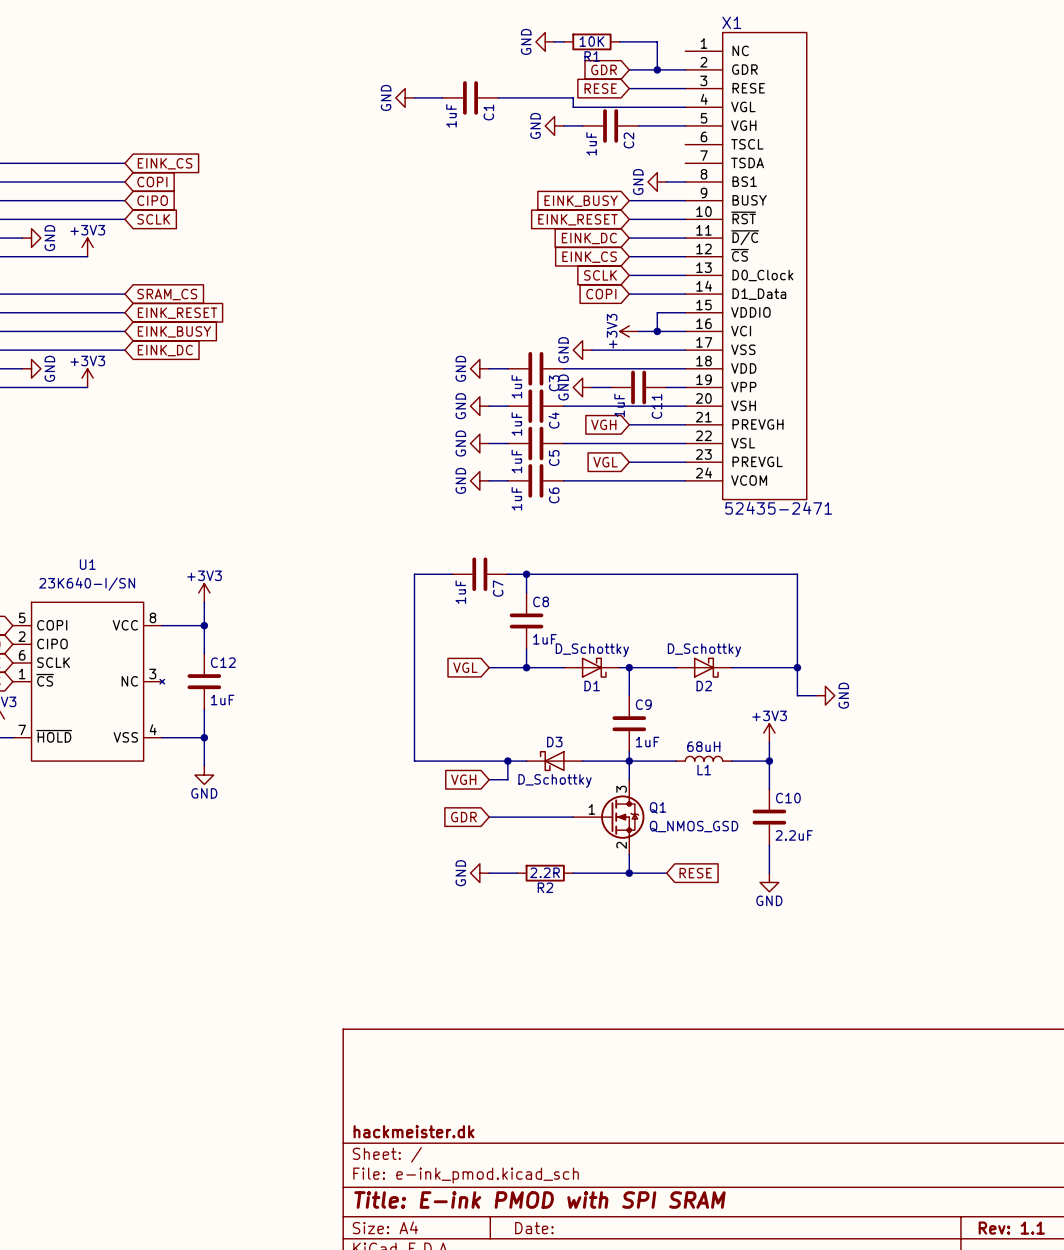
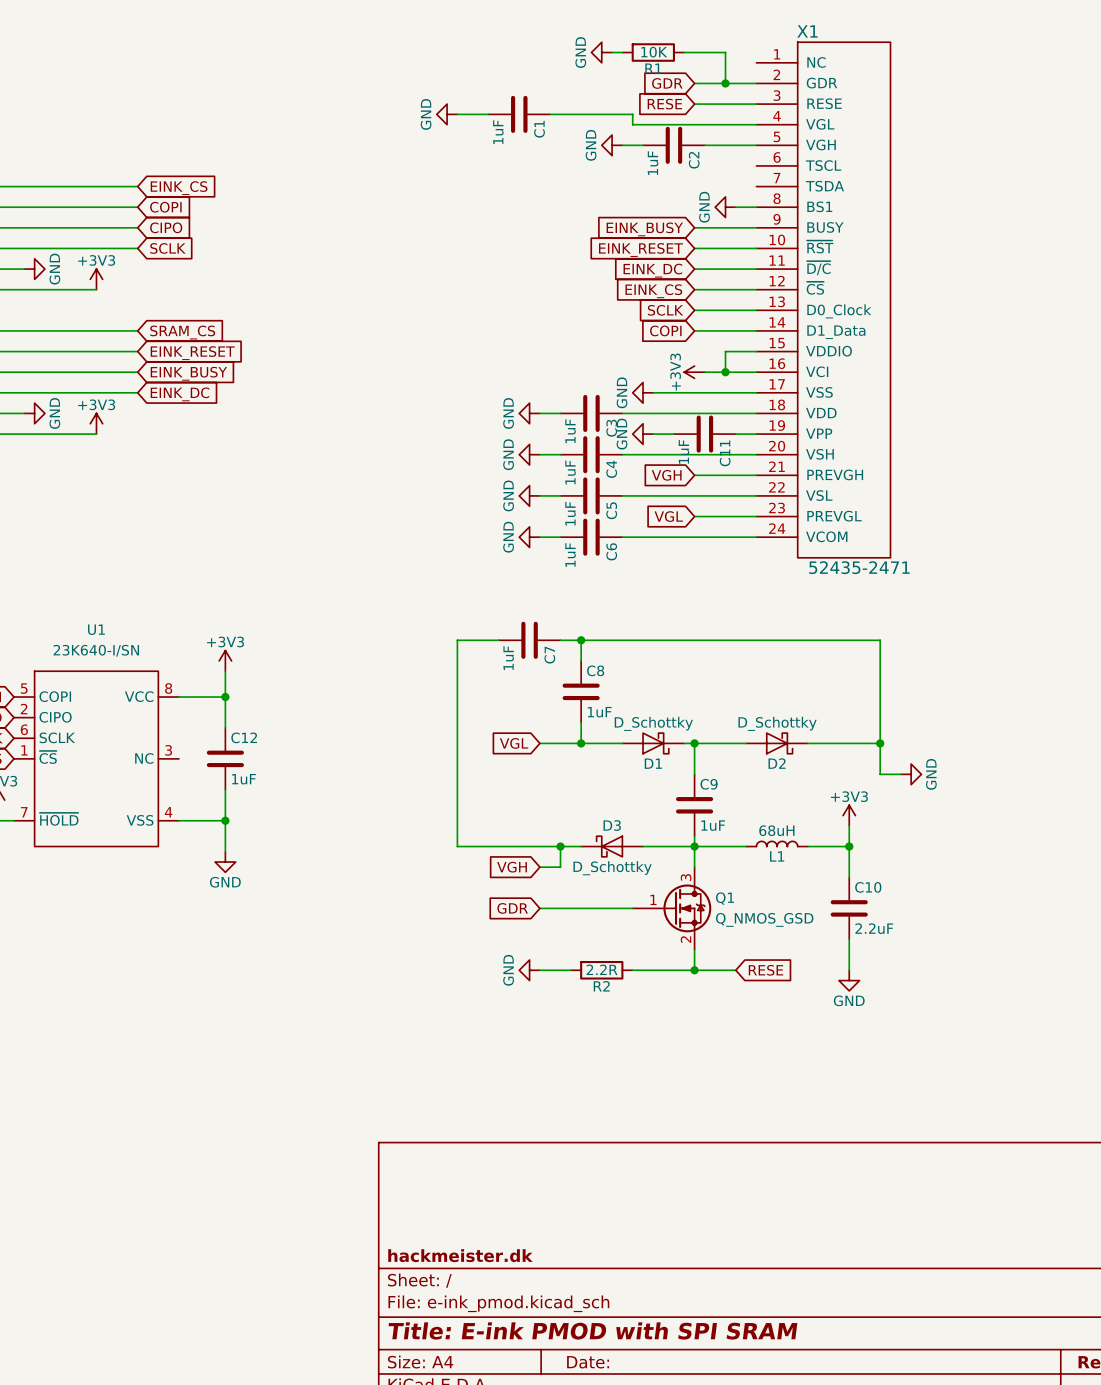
U1 symbol: [12, 602, 165, 762] -> [13, 671, 179, 847]

